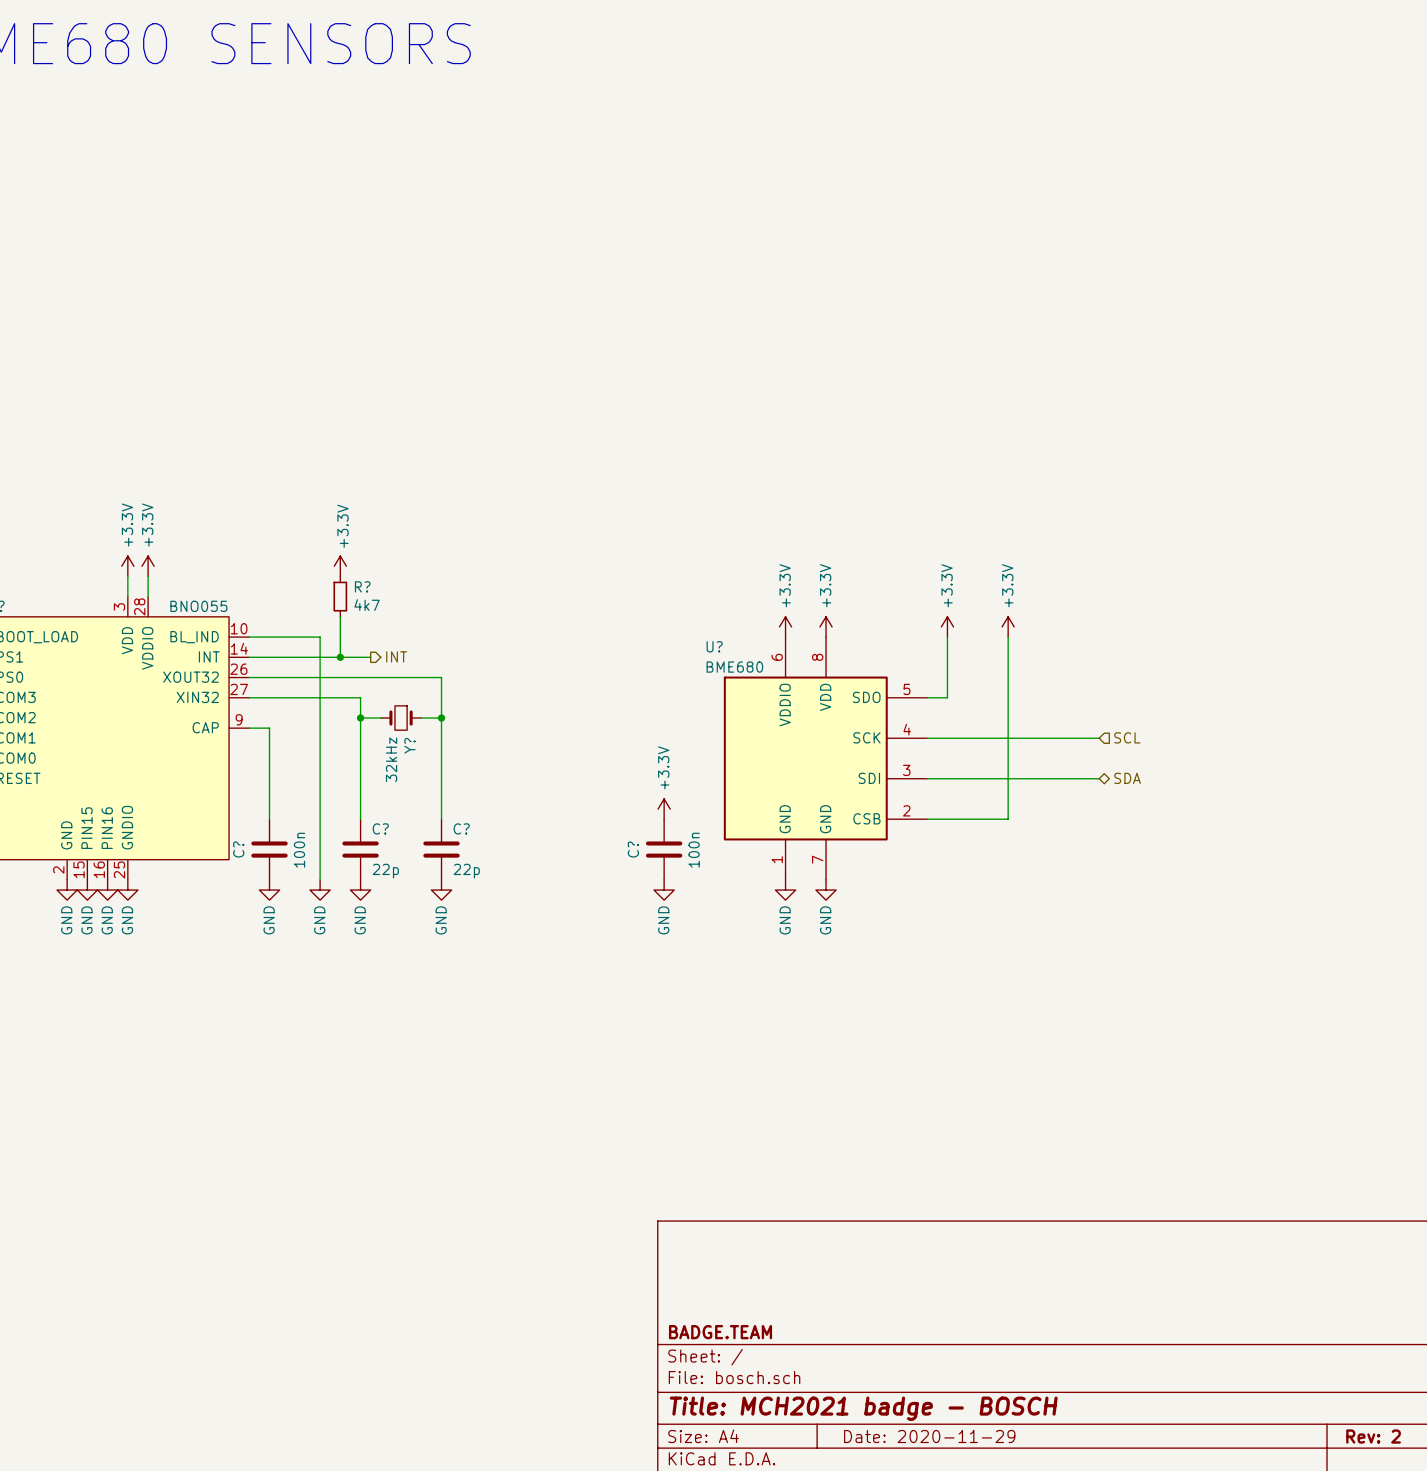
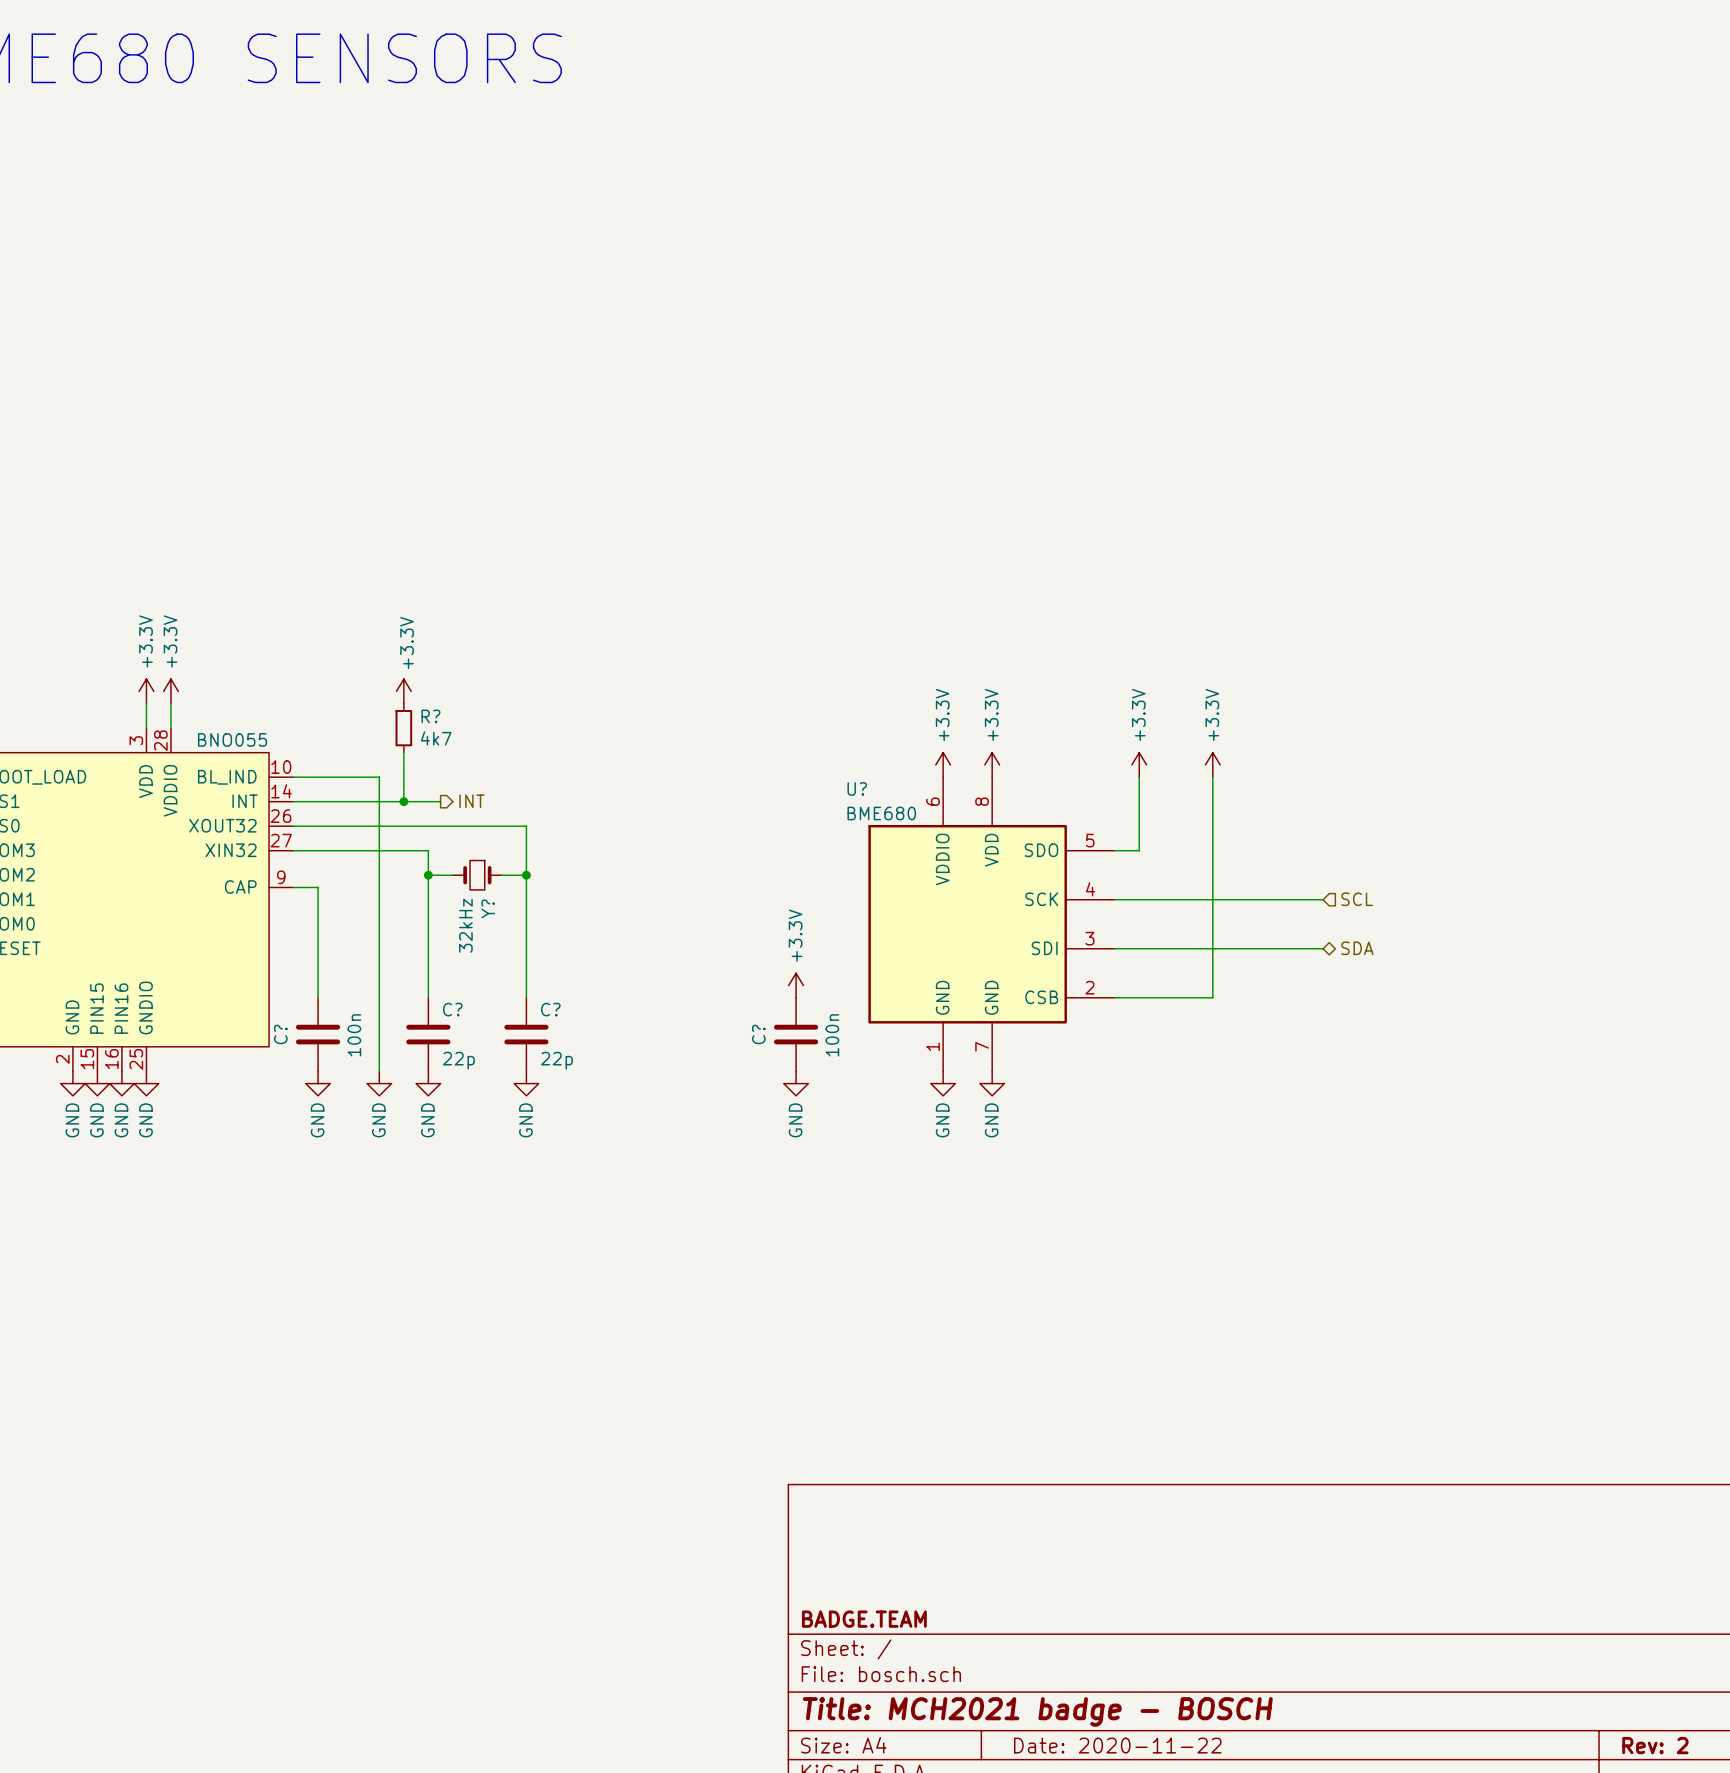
title block: Date: 2020-11-29 (929, 1436) -> Date: 2020-11-22 (1117, 1745)

